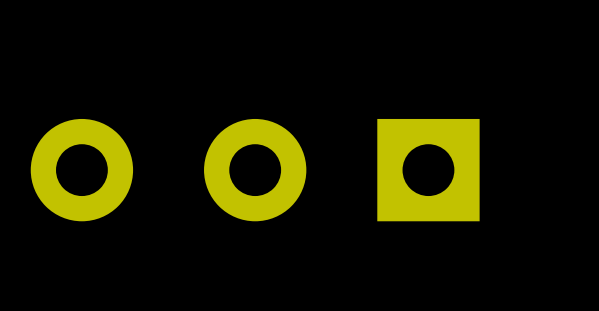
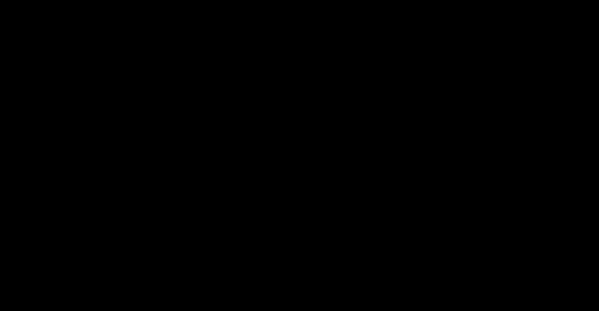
part: (255, 170) -> none

